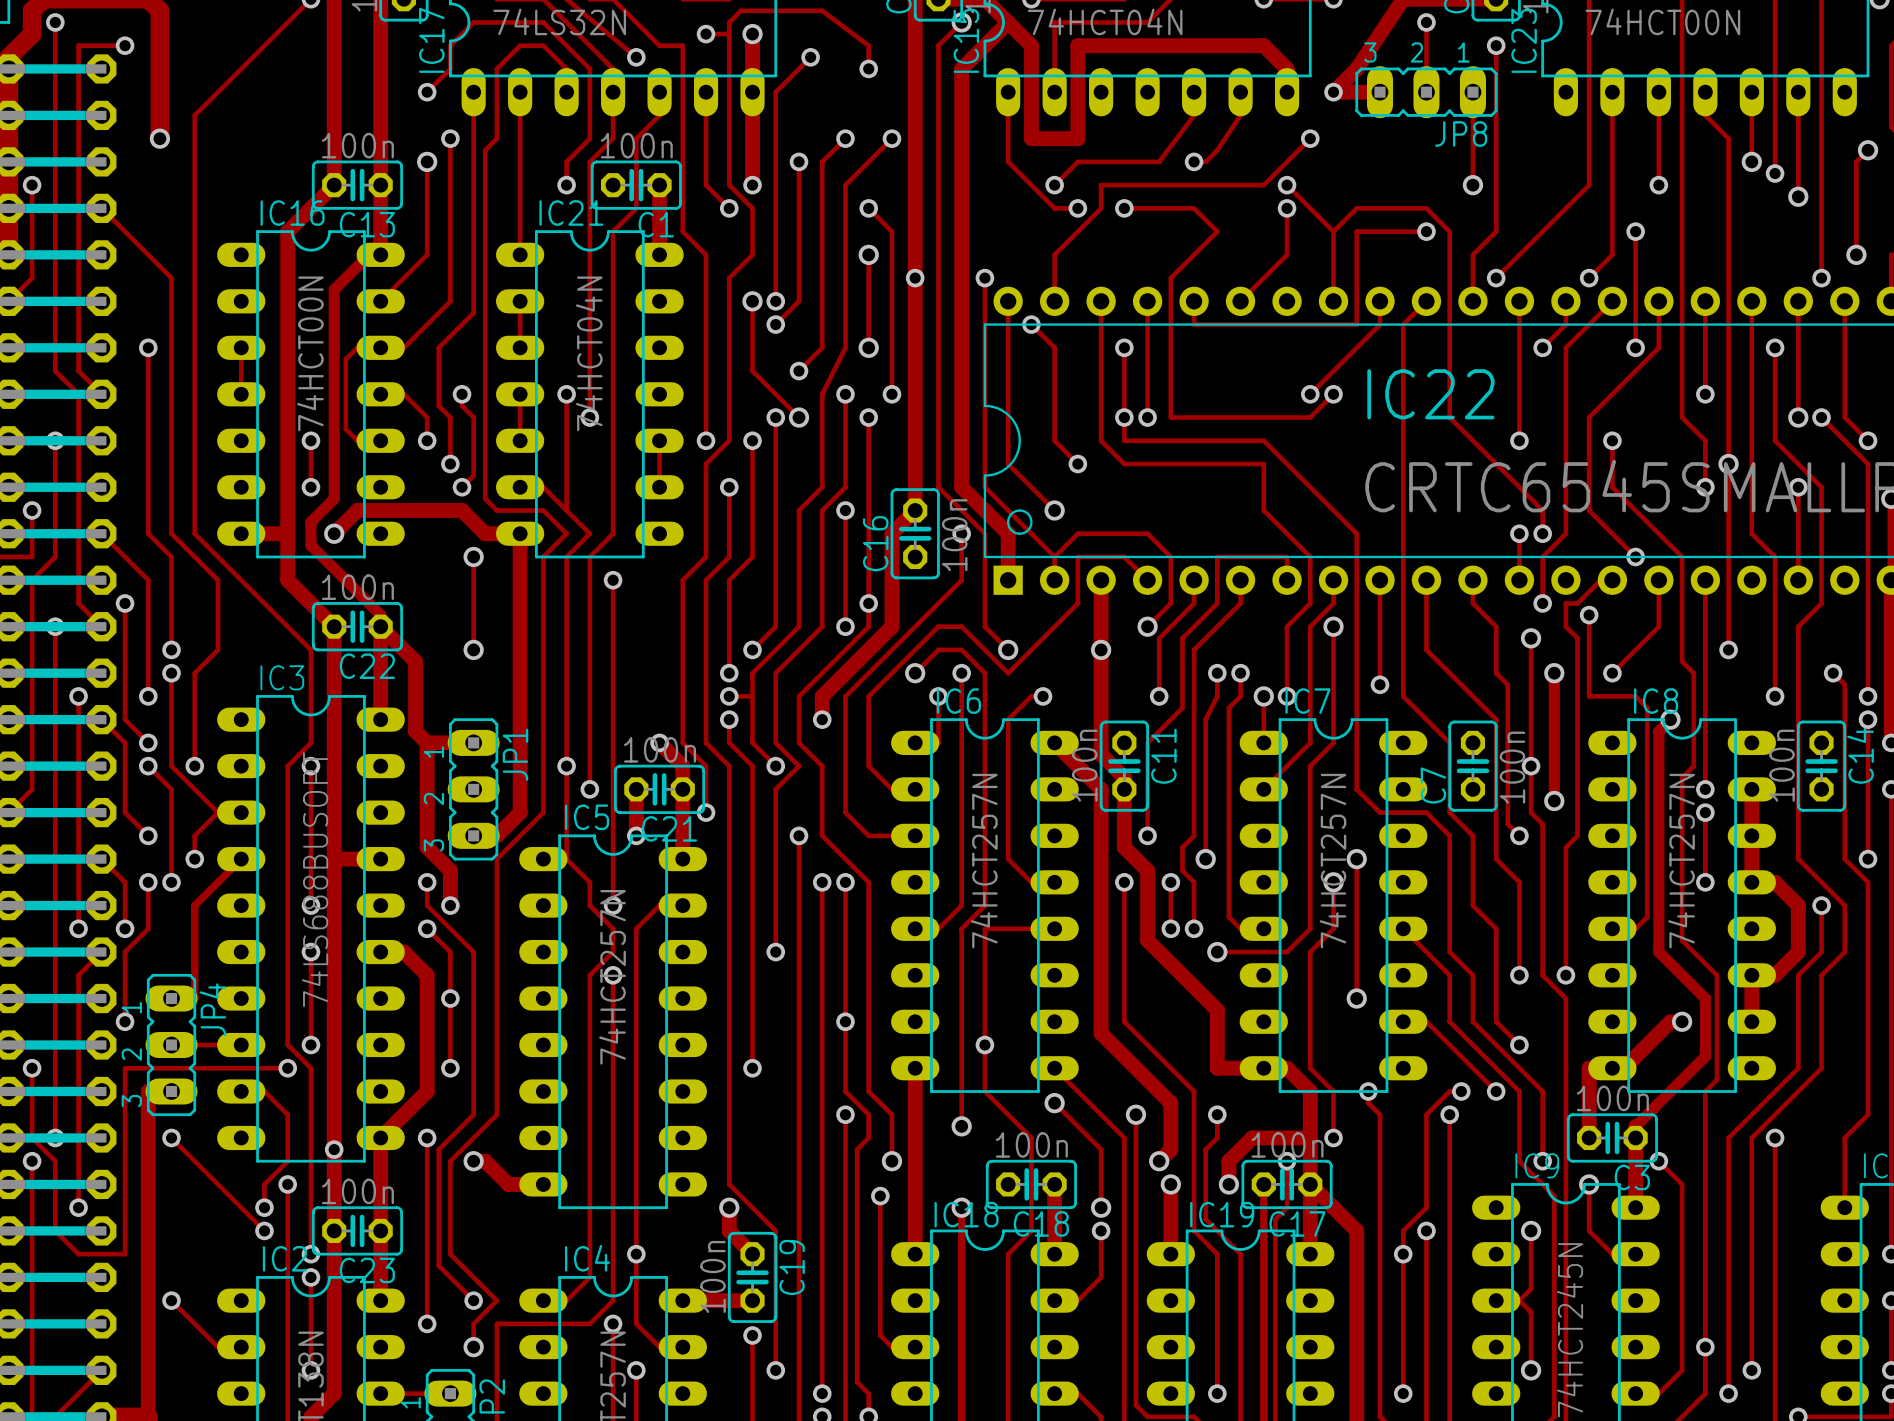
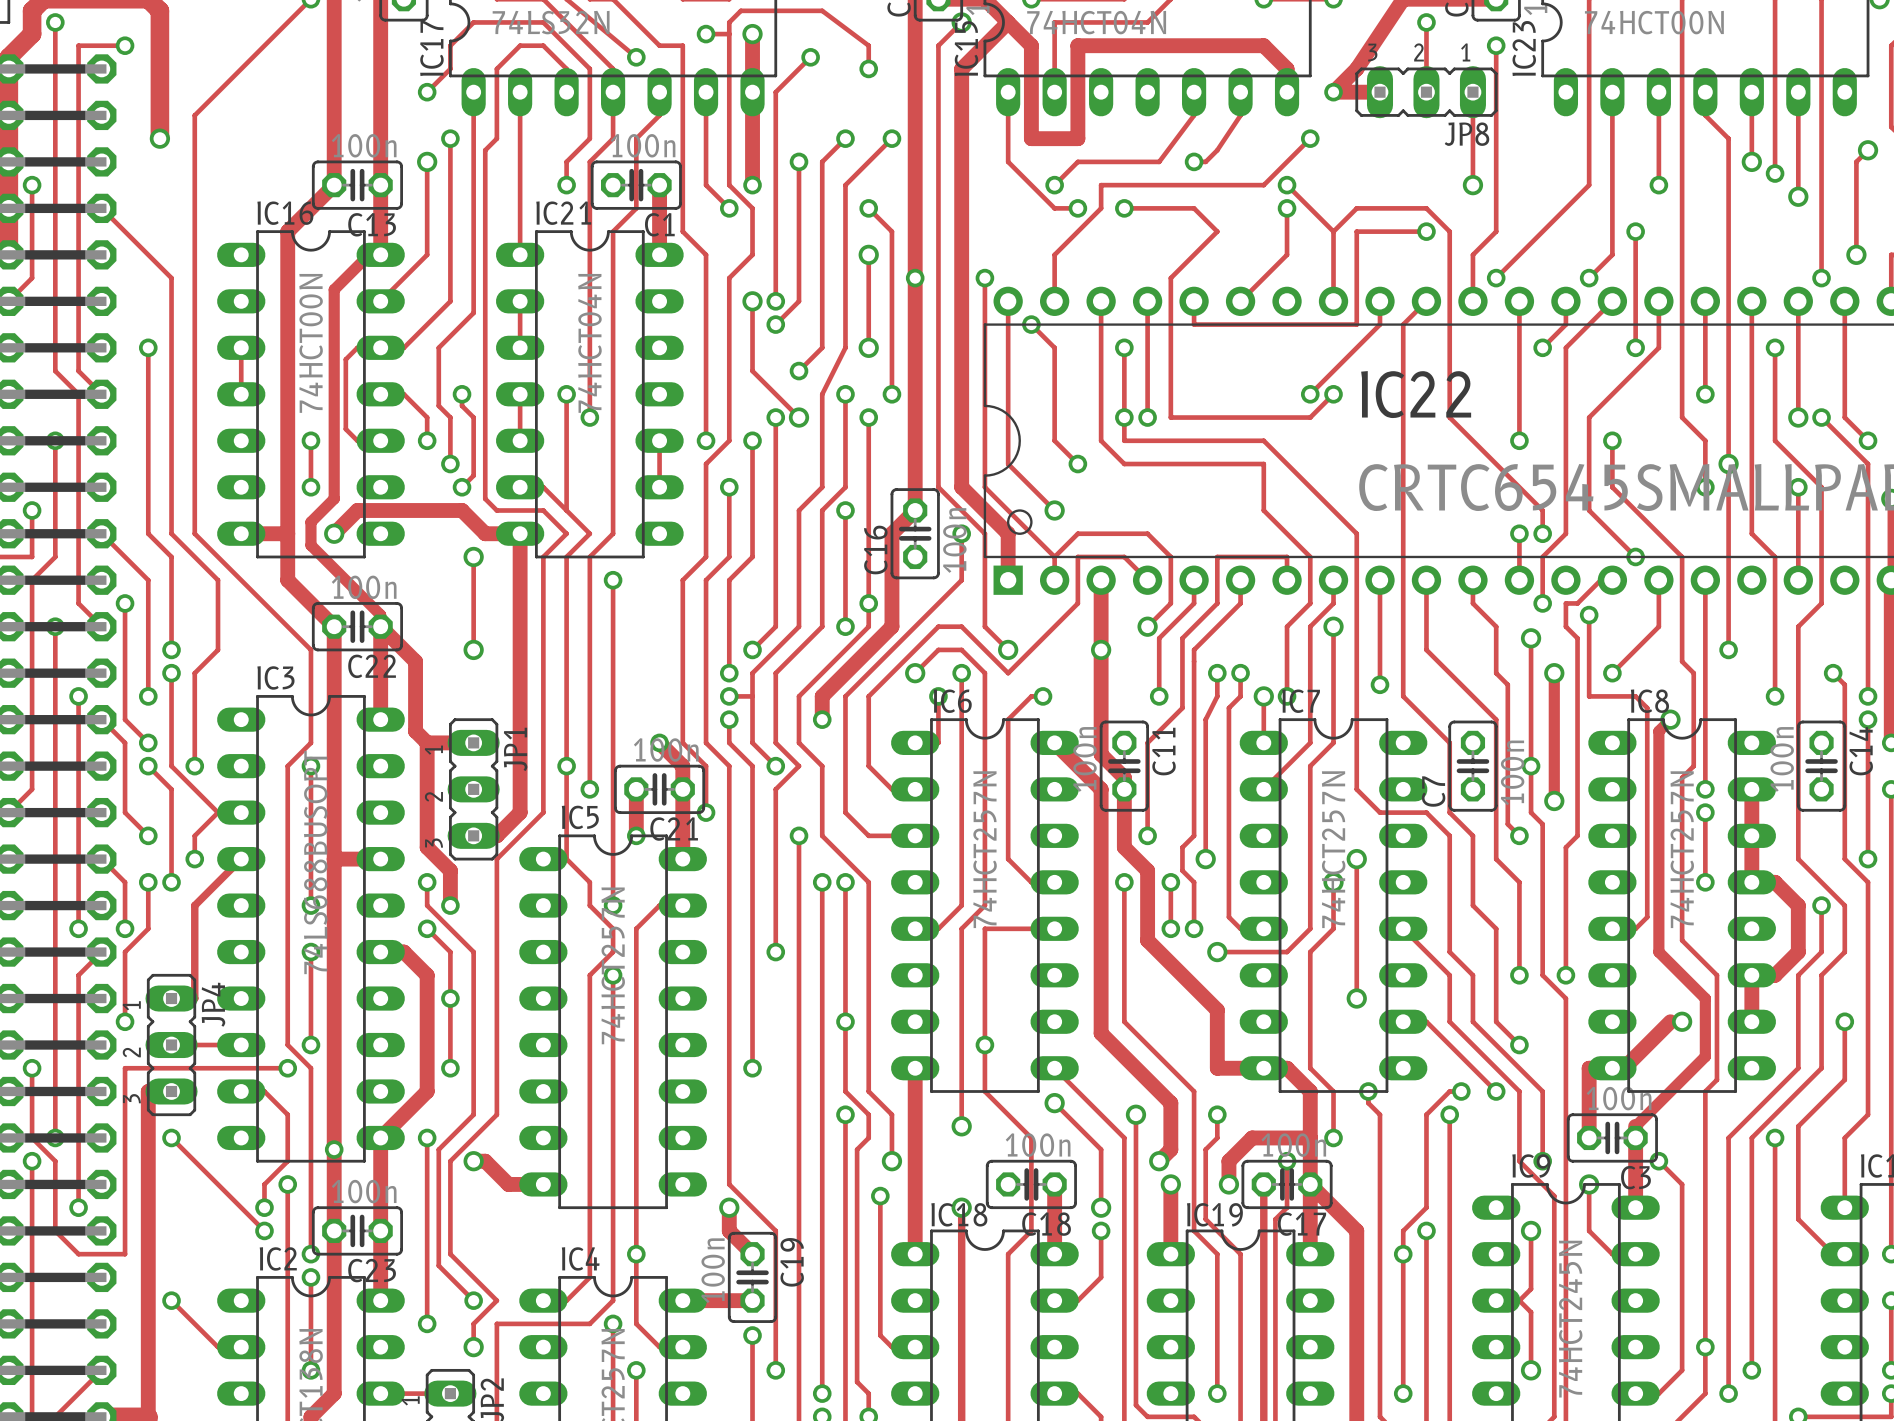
track: none -> (1844, 1021) (1844, 1079) (1798, 1126) (1798, 1219) (1833, 1254) (1844, 1254)
via: none -> (1844, 1021)

